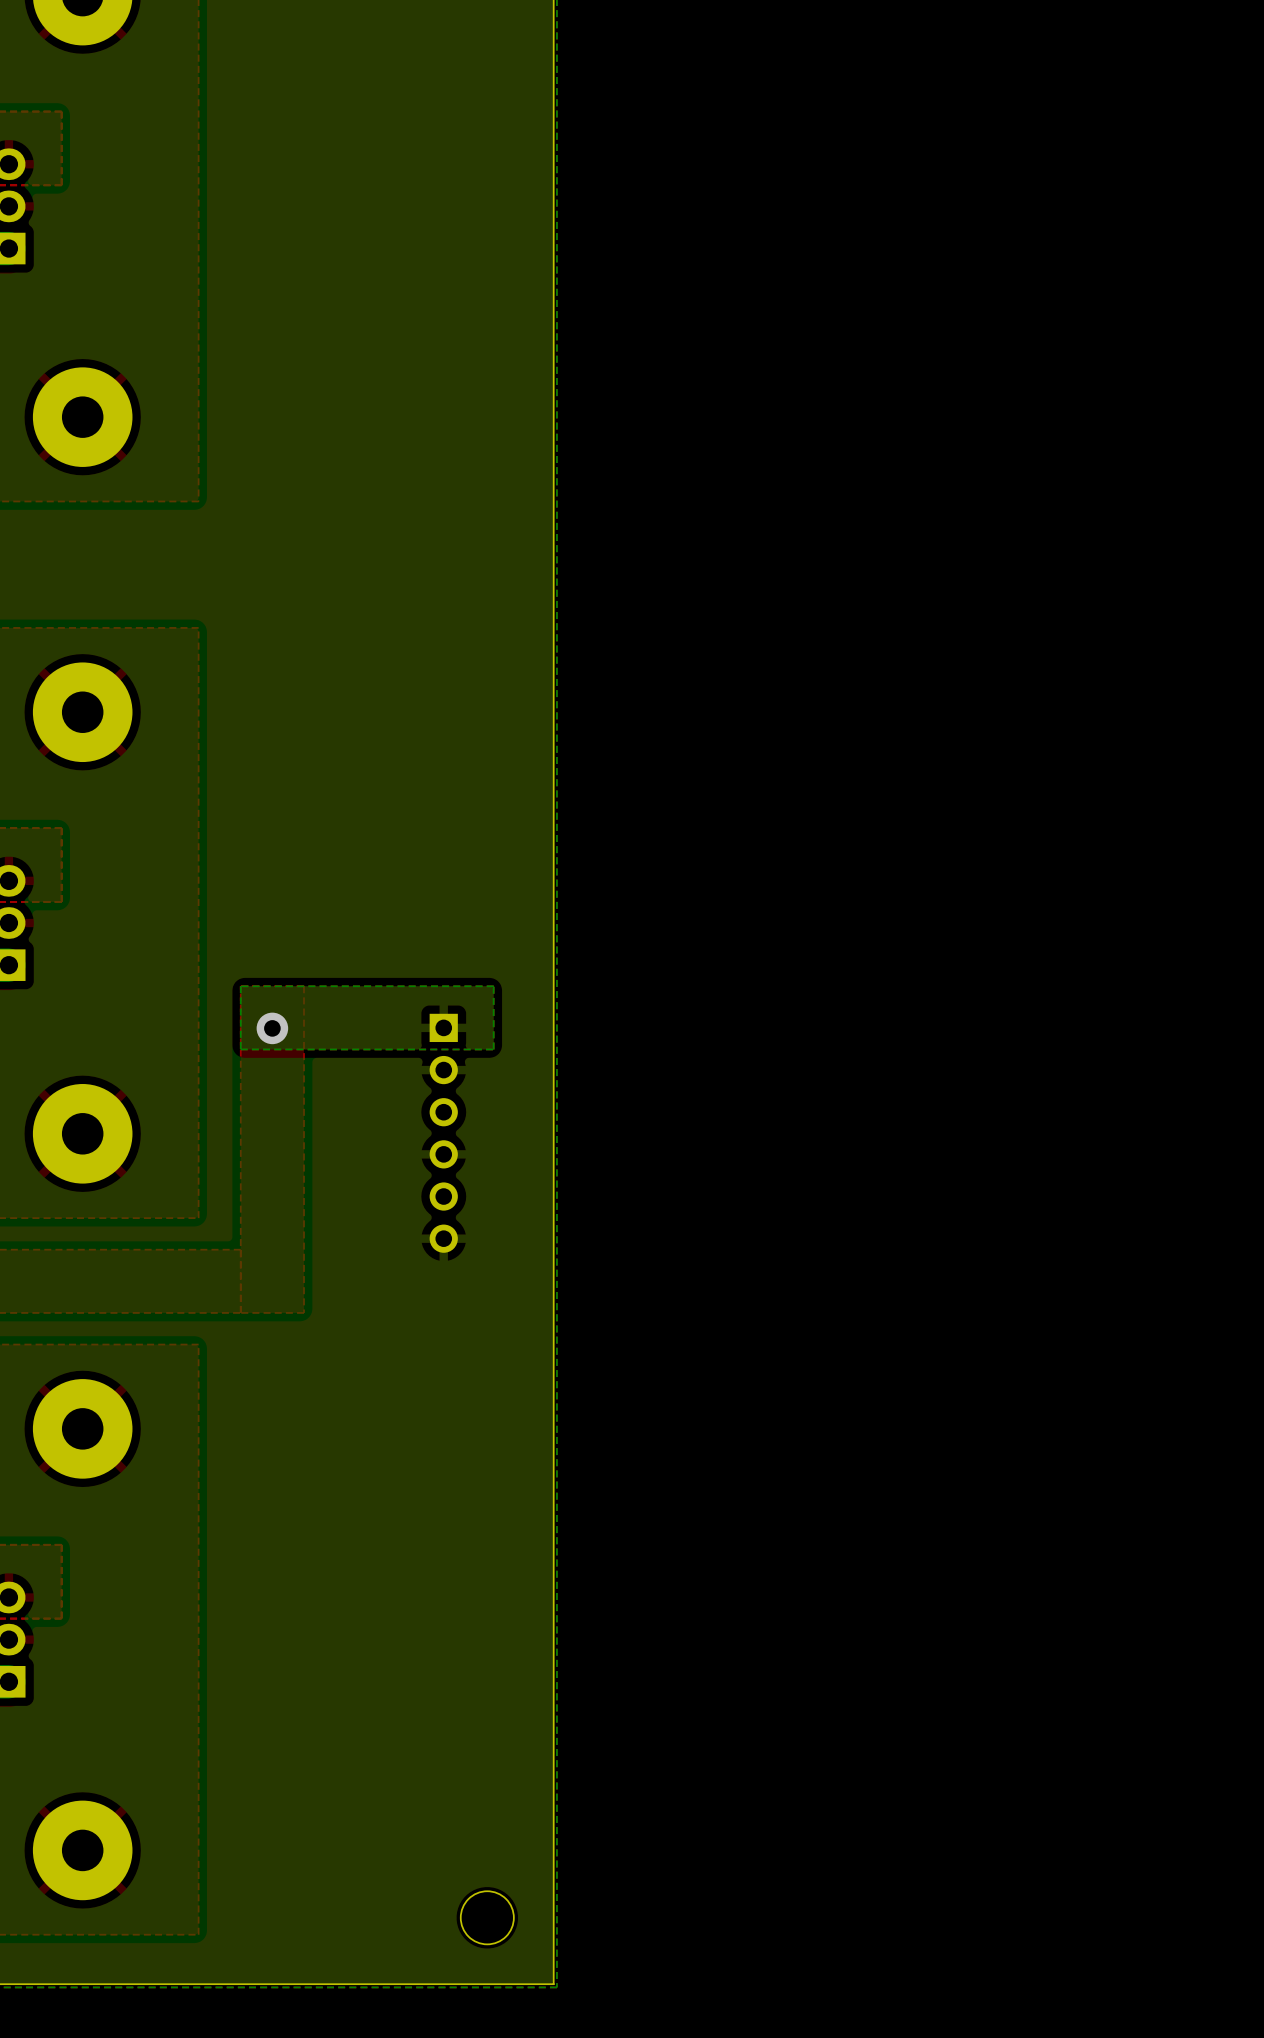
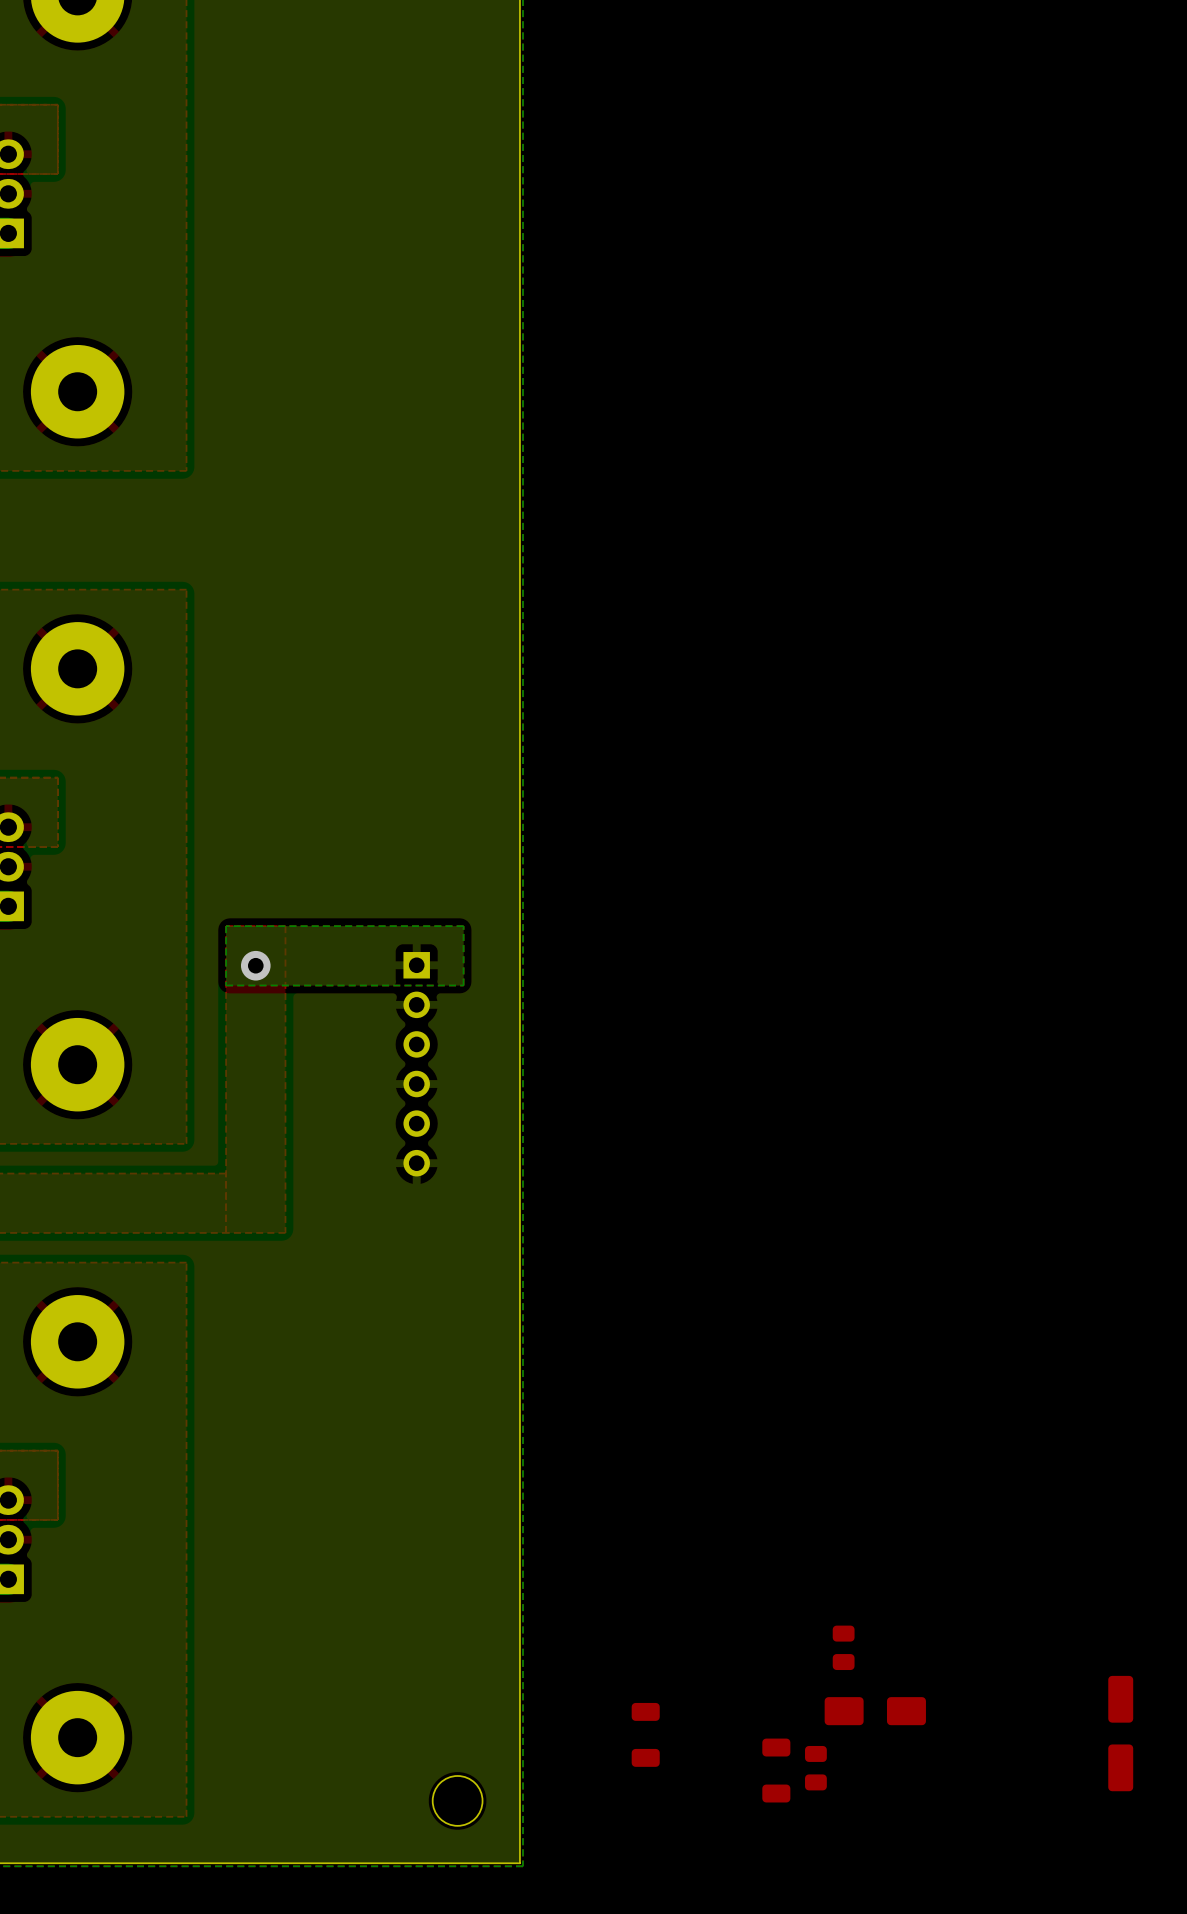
part: none -> (843, 1647)
part: none -> (875, 1711)
part: none -> (1120, 1733)
part: none -> (645, 1734)
part: none -> (815, 1768)
part: none -> (776, 1770)

